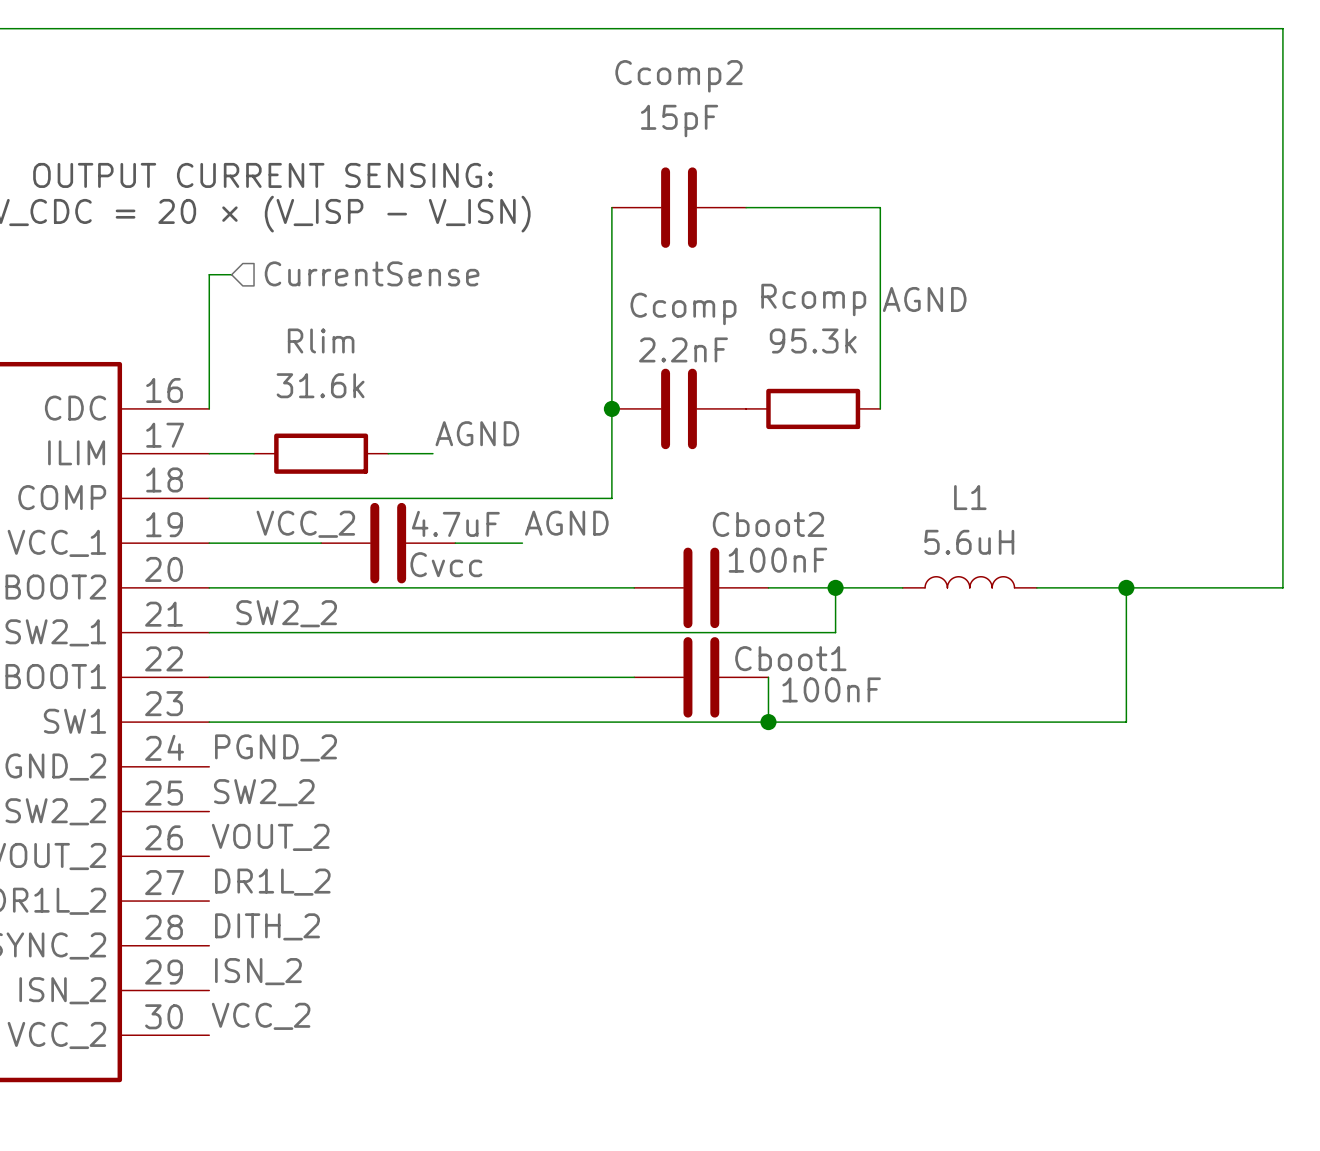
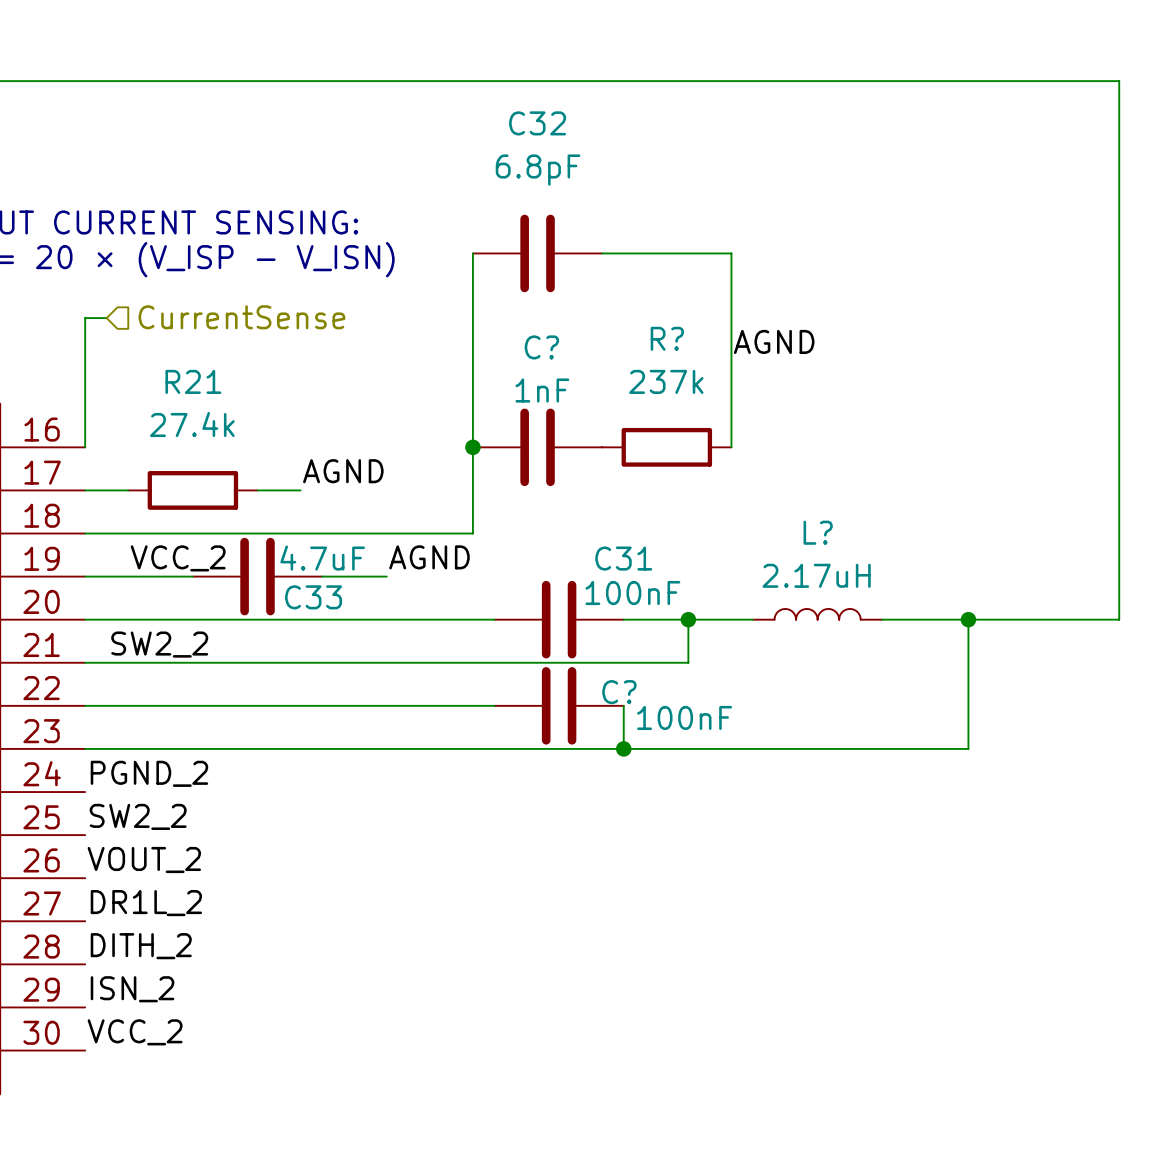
Ccomp2 name: Ccomp2 (679, 76) -> C32 (537, 123)
Ccomp2 value: 15pF (679, 121) -> 6.8pF (538, 170)
Rcomp name: Rcomp (813, 299) -> R? (667, 338)
Ccomp name: Ccomp (683, 308) -> C? (541, 347)
Rlim name: Rlim (321, 340) -> R21 (193, 381)
Rcomp value: 95.3k (813, 340) -> 237k (666, 381)
Ccomp value: 2.2nF (683, 349) -> 1nF (542, 390)
Rlim value: 31.6k (320, 385) -> 27.4k (192, 424)
L1 name: L1 (970, 497) -> L? (818, 532)
Cboot2 name: Cboot2 (768, 524) -> C31 (623, 558)
L1 value: 5.6uH (969, 542) -> 2.17uH (816, 575)
Cvcc name: Cvcc (446, 564) -> C33 (313, 597)
Cboot1 name: Cboot1 (790, 658) -> C? (619, 692)

